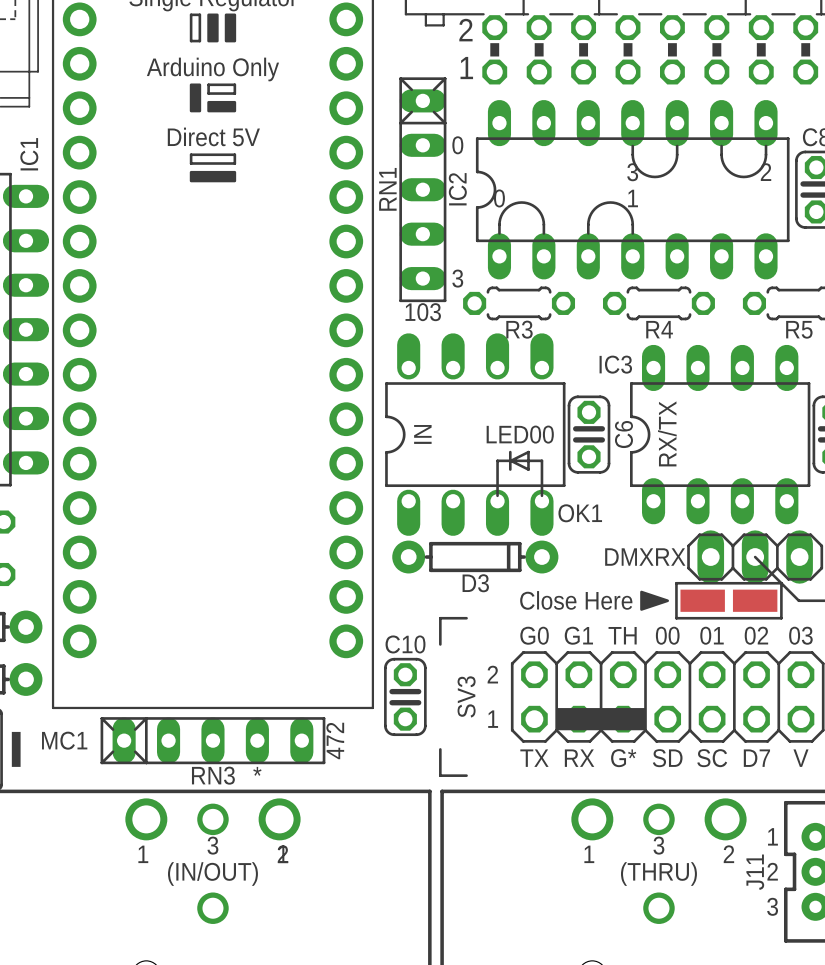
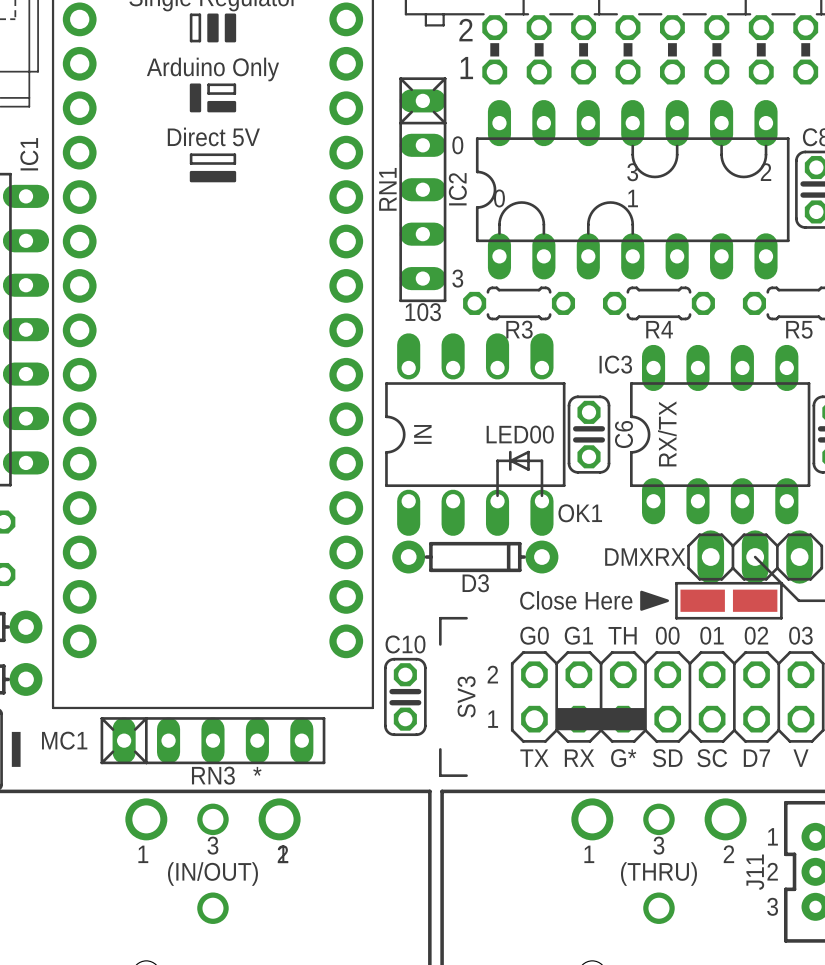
text: 472 (335, 740) -> none

